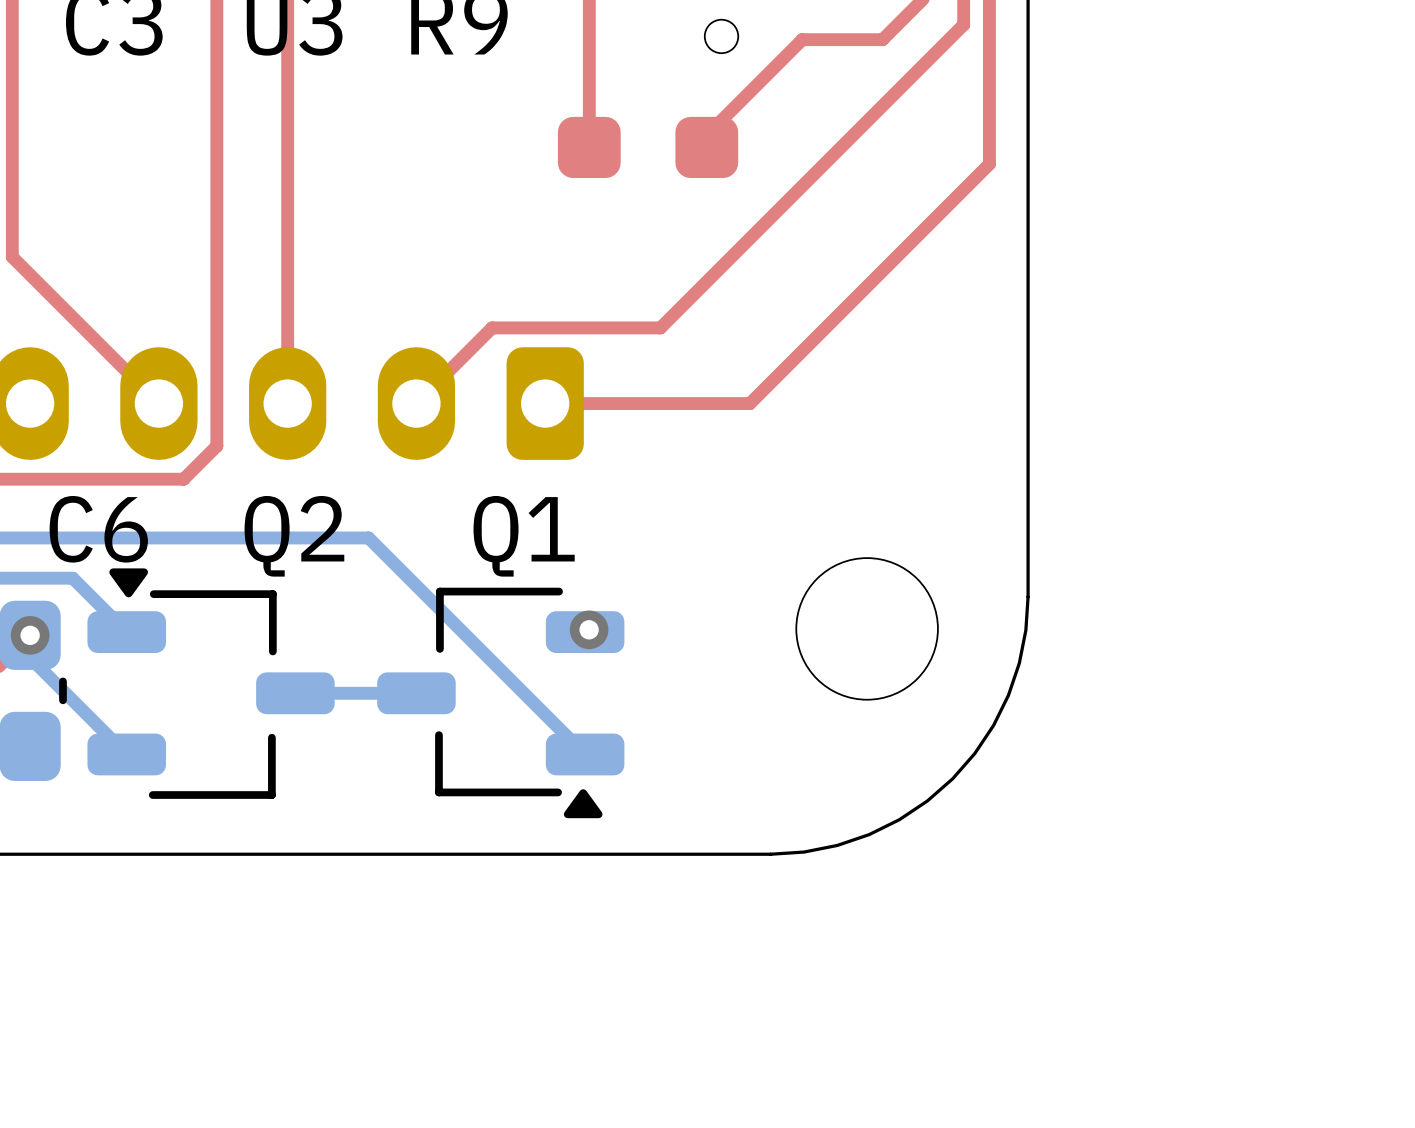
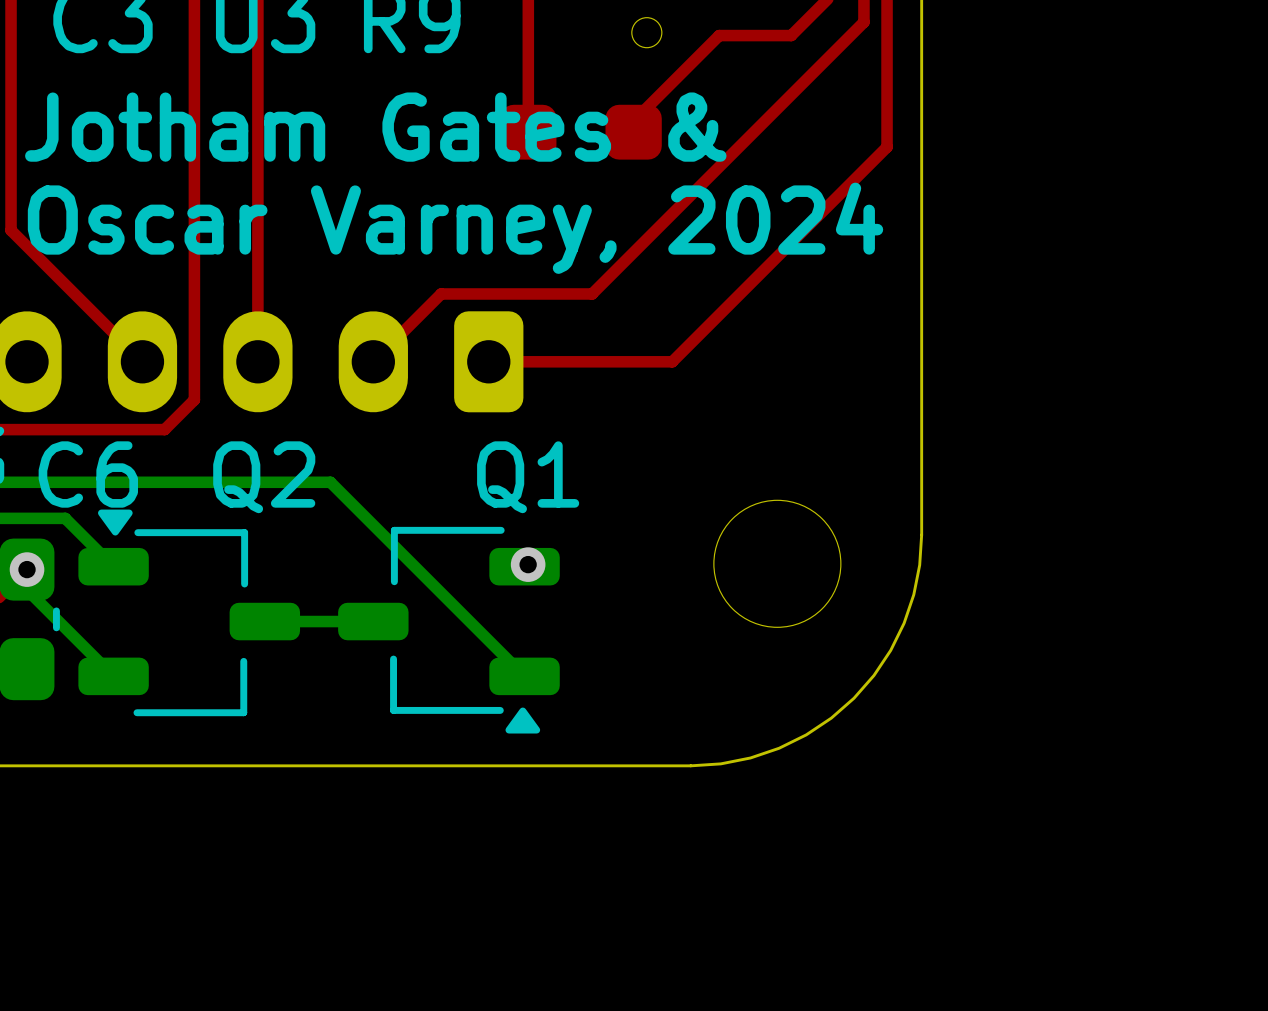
text: none -> Jotham Gates & (375, 127)
text: none -> Oscar Varney, 2024 (455, 228)
Q1 name position: Q1 (524, 536) -> Q1 (528, 477)

